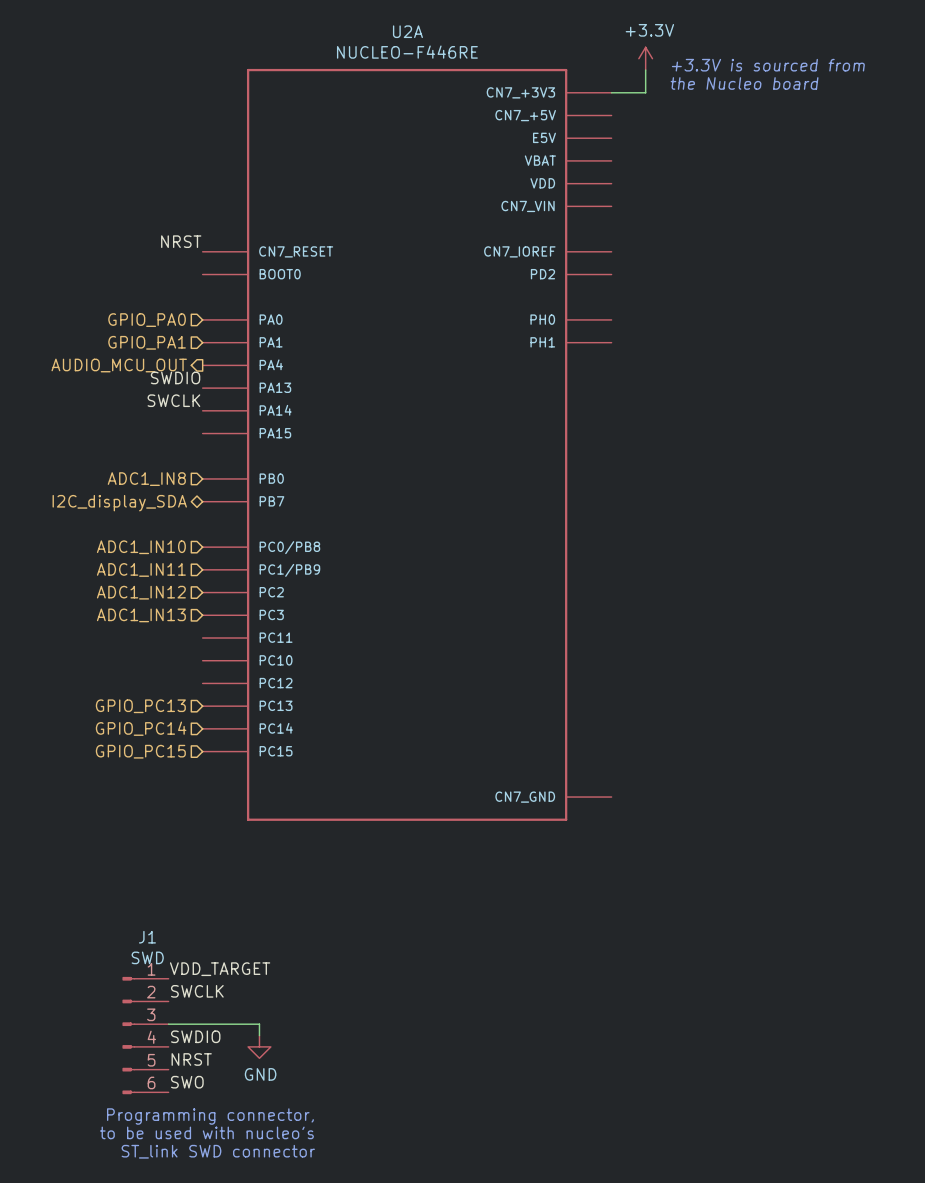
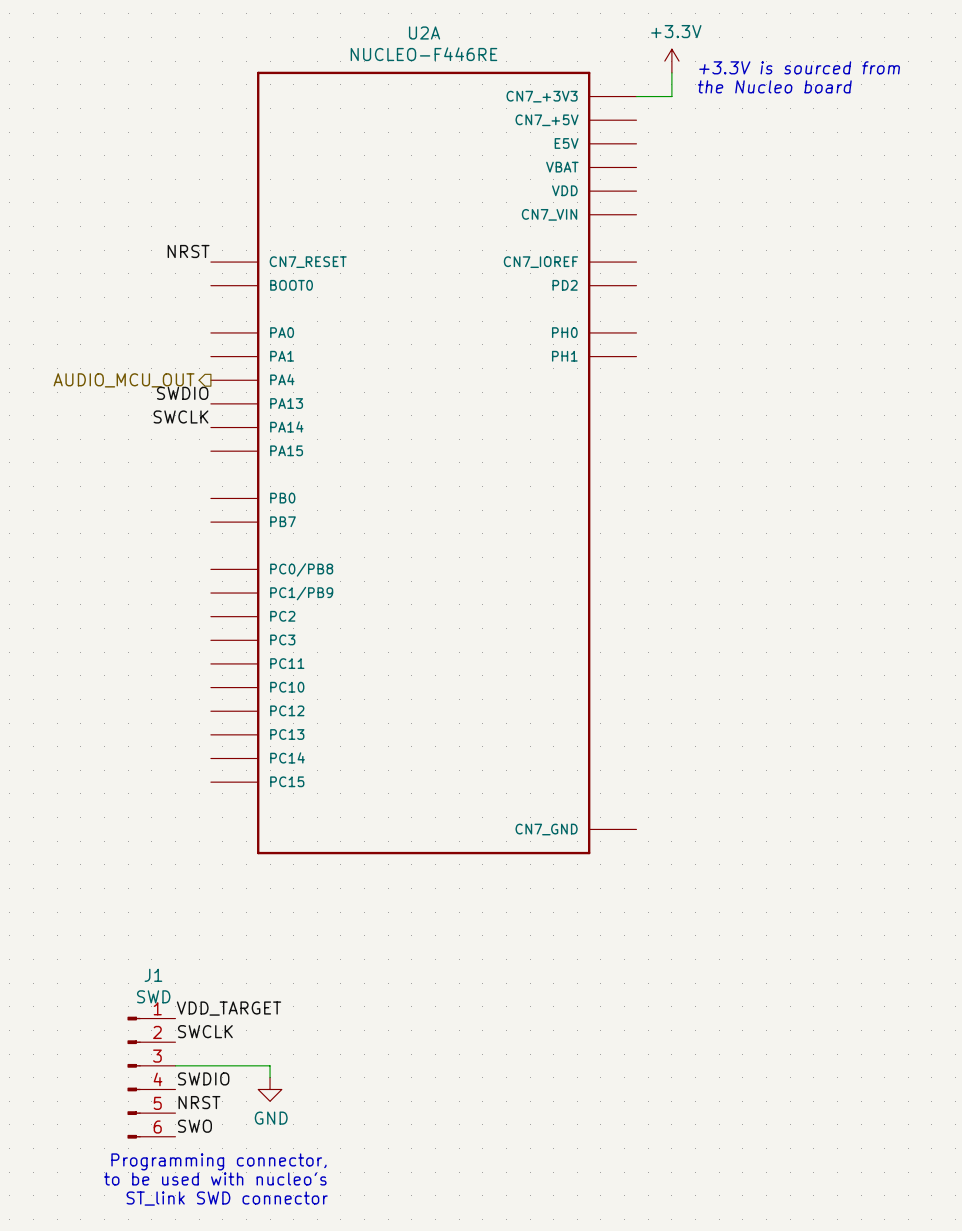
hierarchical label: GPIO_PA0 (147, 320) -> none
hierarchical label: GPIO_PA1 (147, 342) -> none
hierarchical label: ADC1_IN8 (146, 479) -> none
hierarchical label: I2C_display_SDA (119, 503) -> none
hierarchical label: ADC1_IN10 (141, 547) -> none
hierarchical label: ADC1_IN11 (141, 569) -> none
hierarchical label: ADC1_IN12 (141, 592) -> none
hierarchical label: ADC1_IN13 (141, 615) -> none
hierarchical label: GPIO_PC13 (140, 706) -> none
hierarchical label: GPIO_PC14 (141, 728) -> none
hierarchical label: GPIO_PC15 (140, 751) -> none

